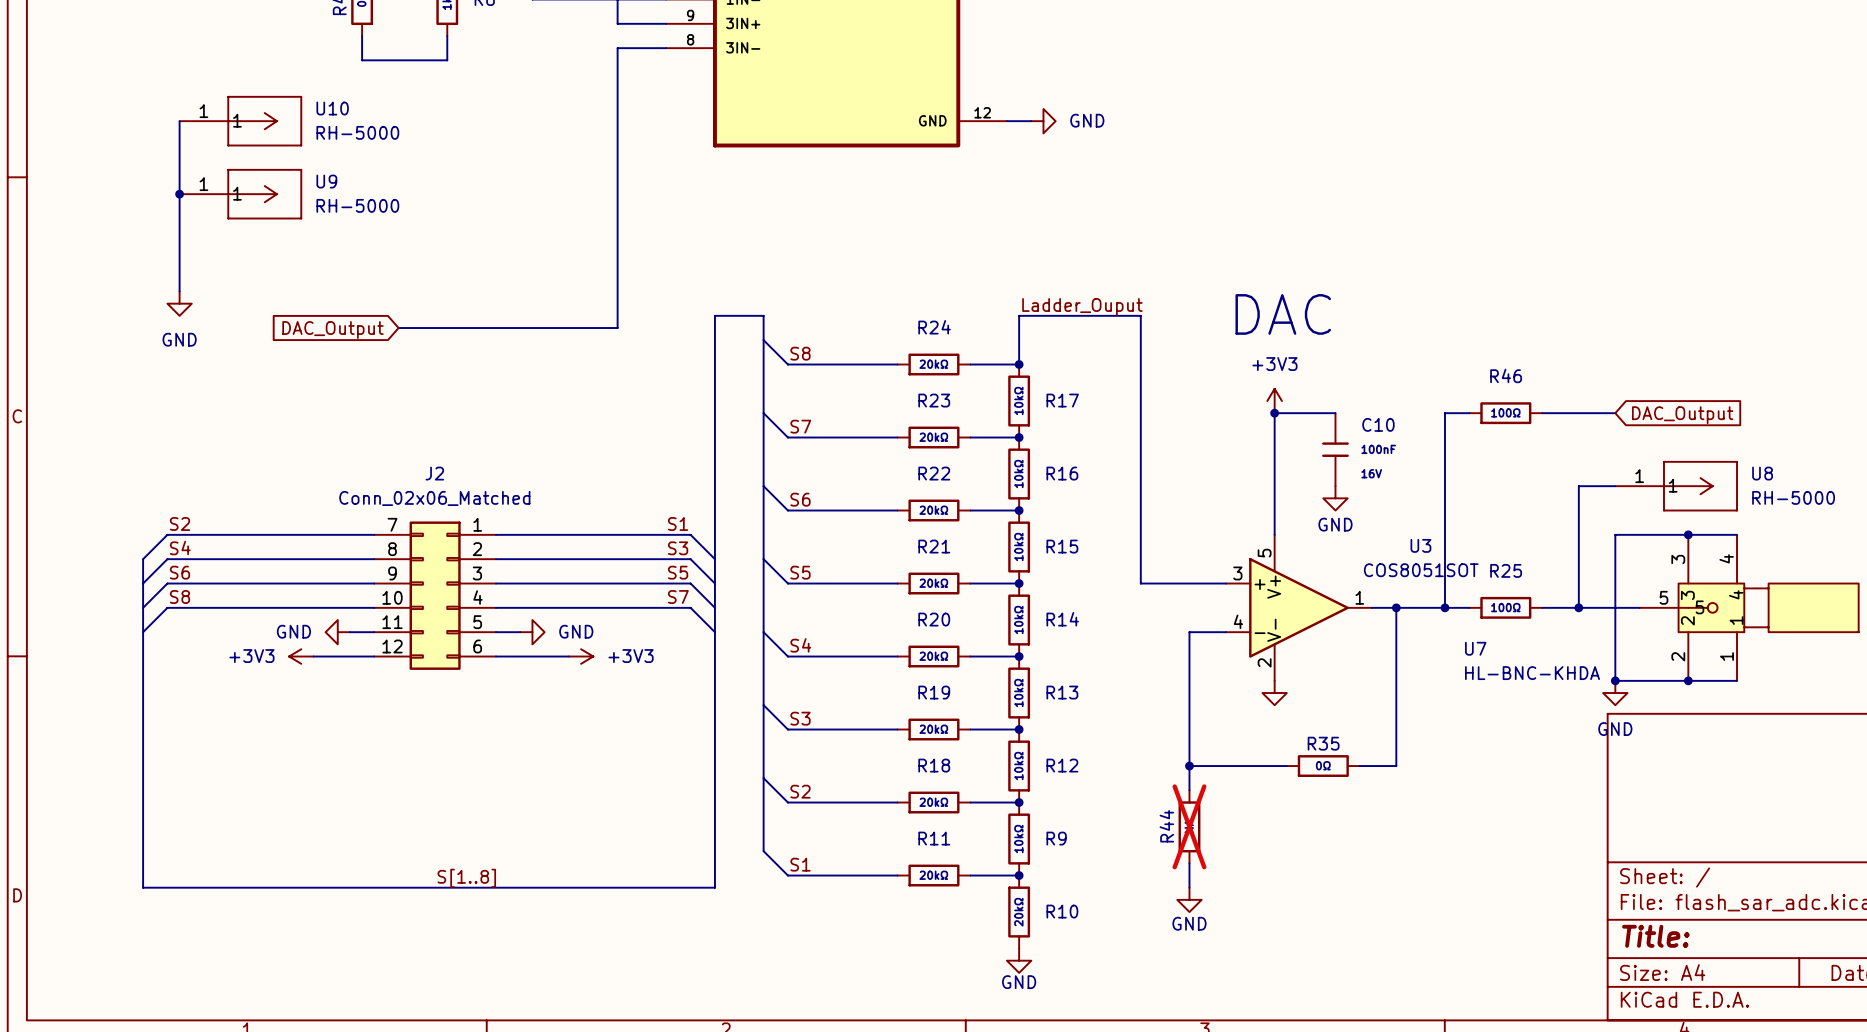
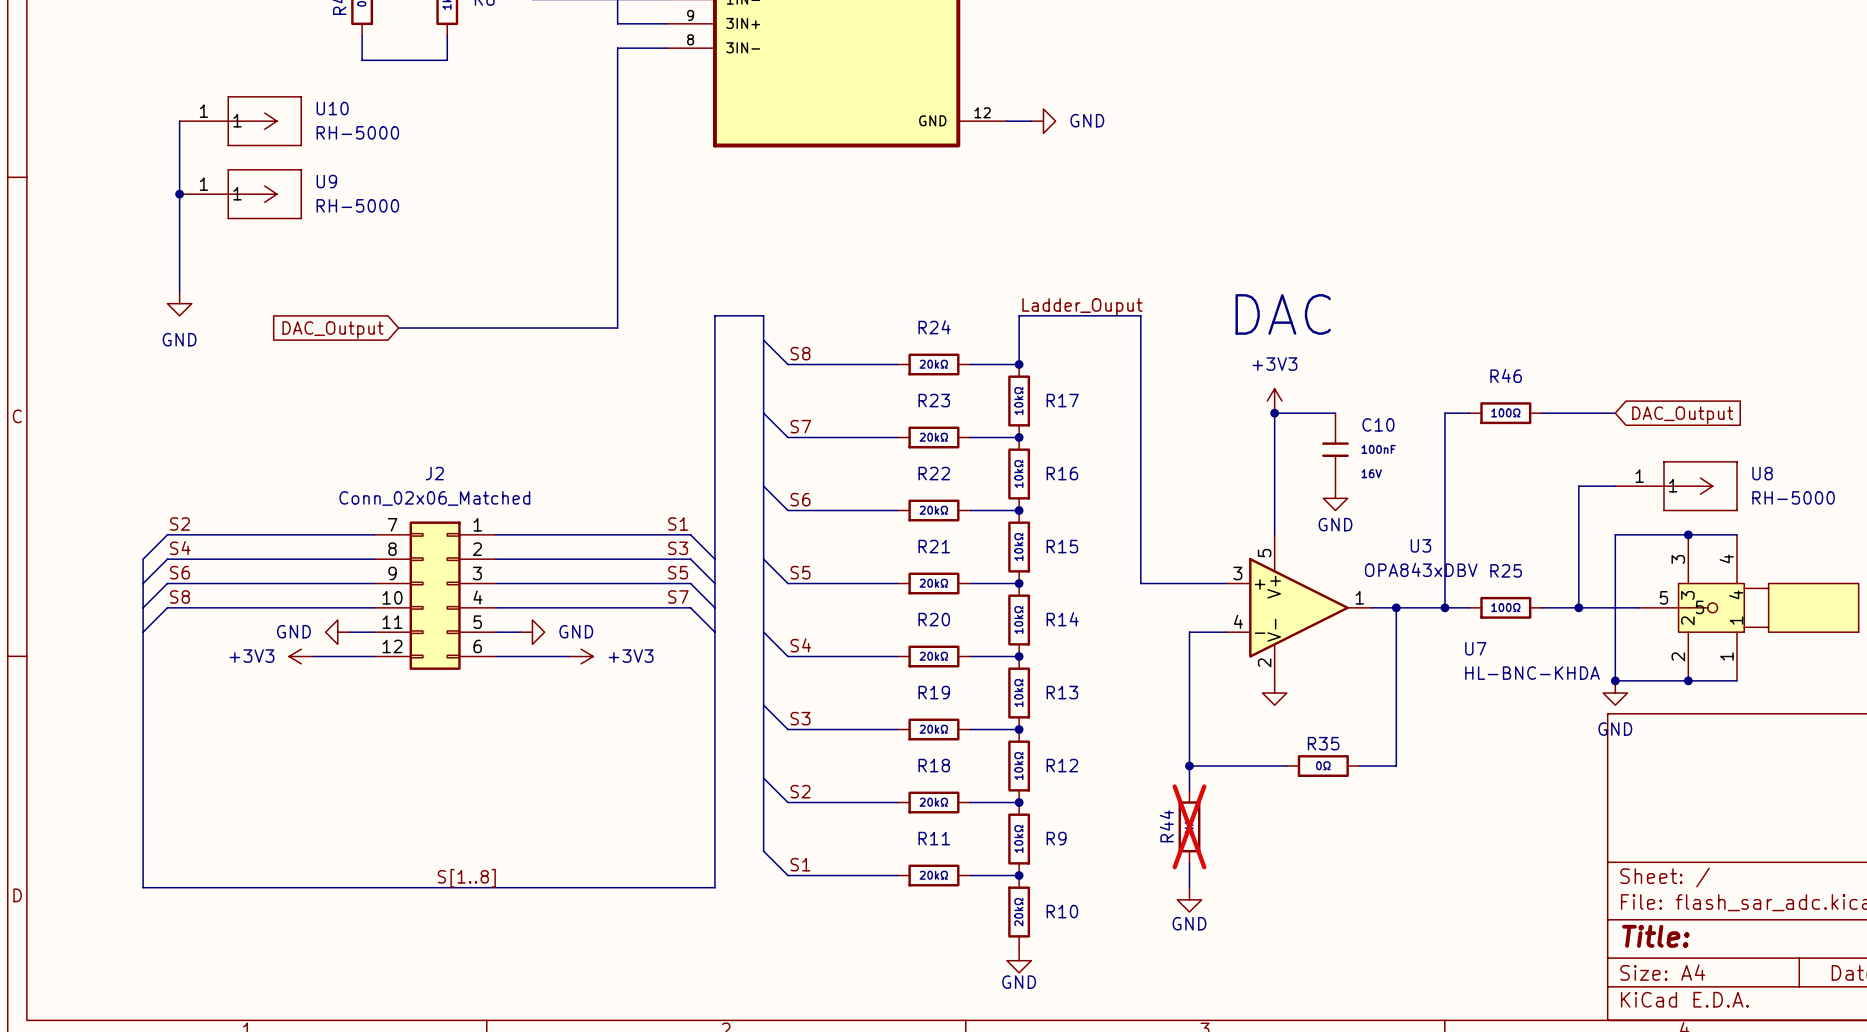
U3 value: COS8051SOT (1421, 570) -> OPA843xDBV (1421, 569)

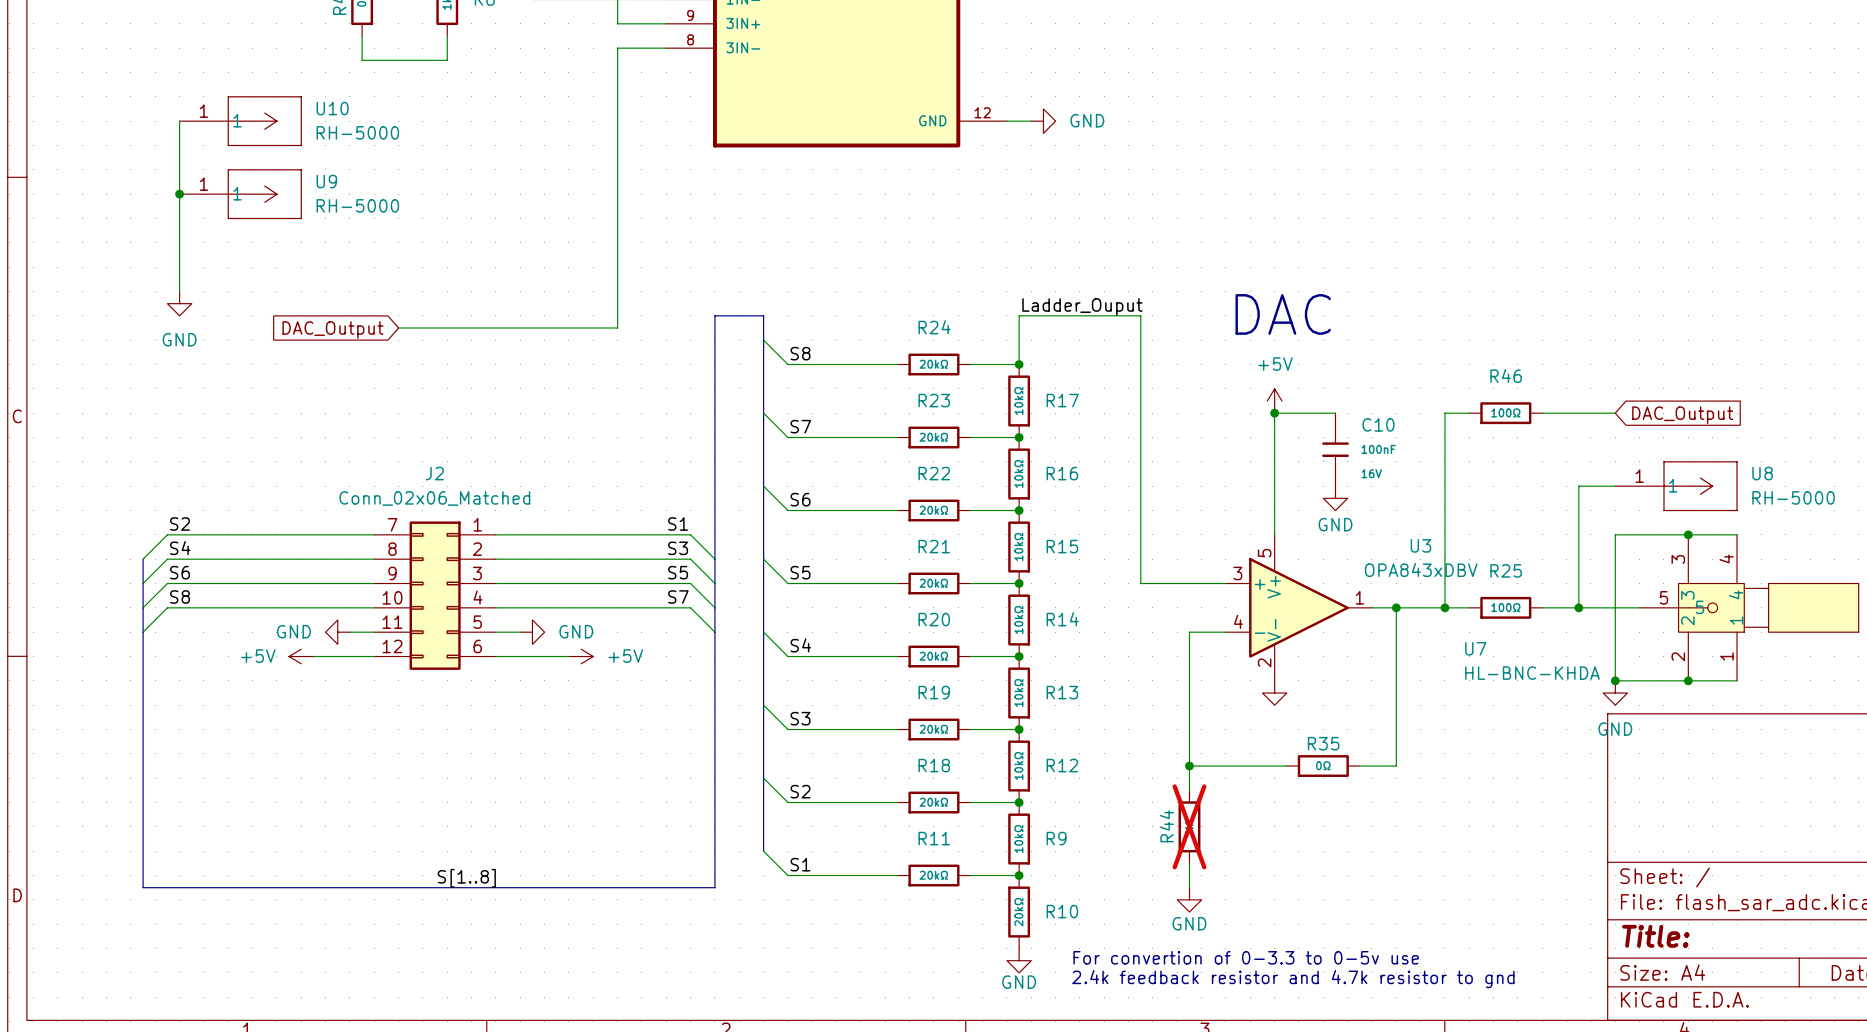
power symbol: +3V3 (1274, 401) -> +5V (1274, 401)
power symbol: +3V3 (301, 656) -> +5V (301, 656)
power symbol: +3V3 (581, 656) -> +5V (581, 656)
text: none -> For convertion of 0-3.3 to 0-5v use (1246, 957)
text: none -> 2.4k feedback resistor and 4.7k resistor to gnd (1293, 979)

